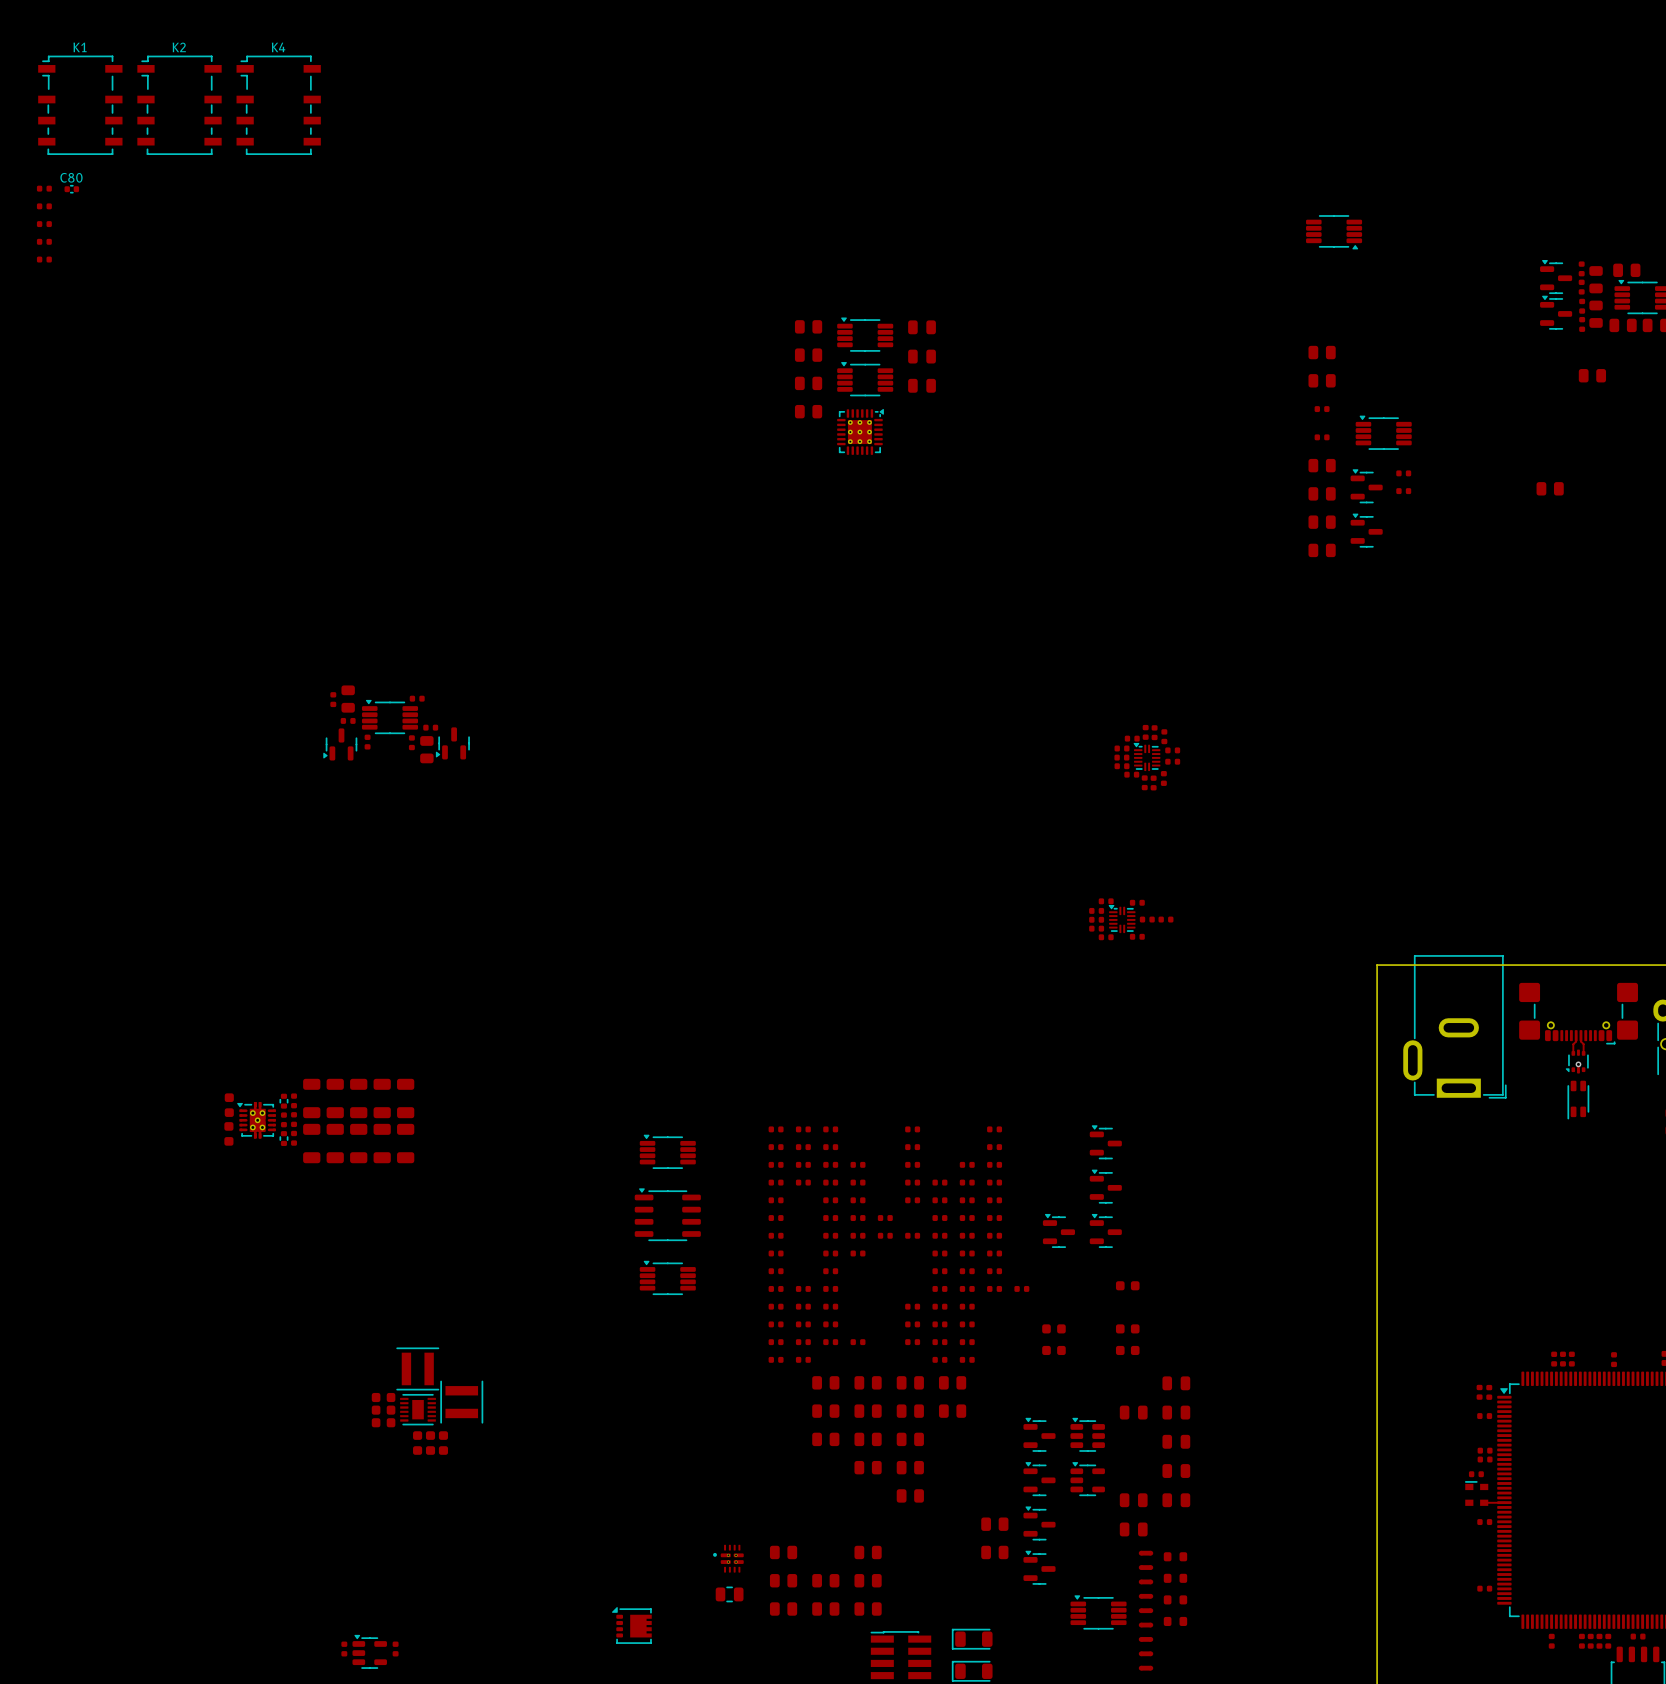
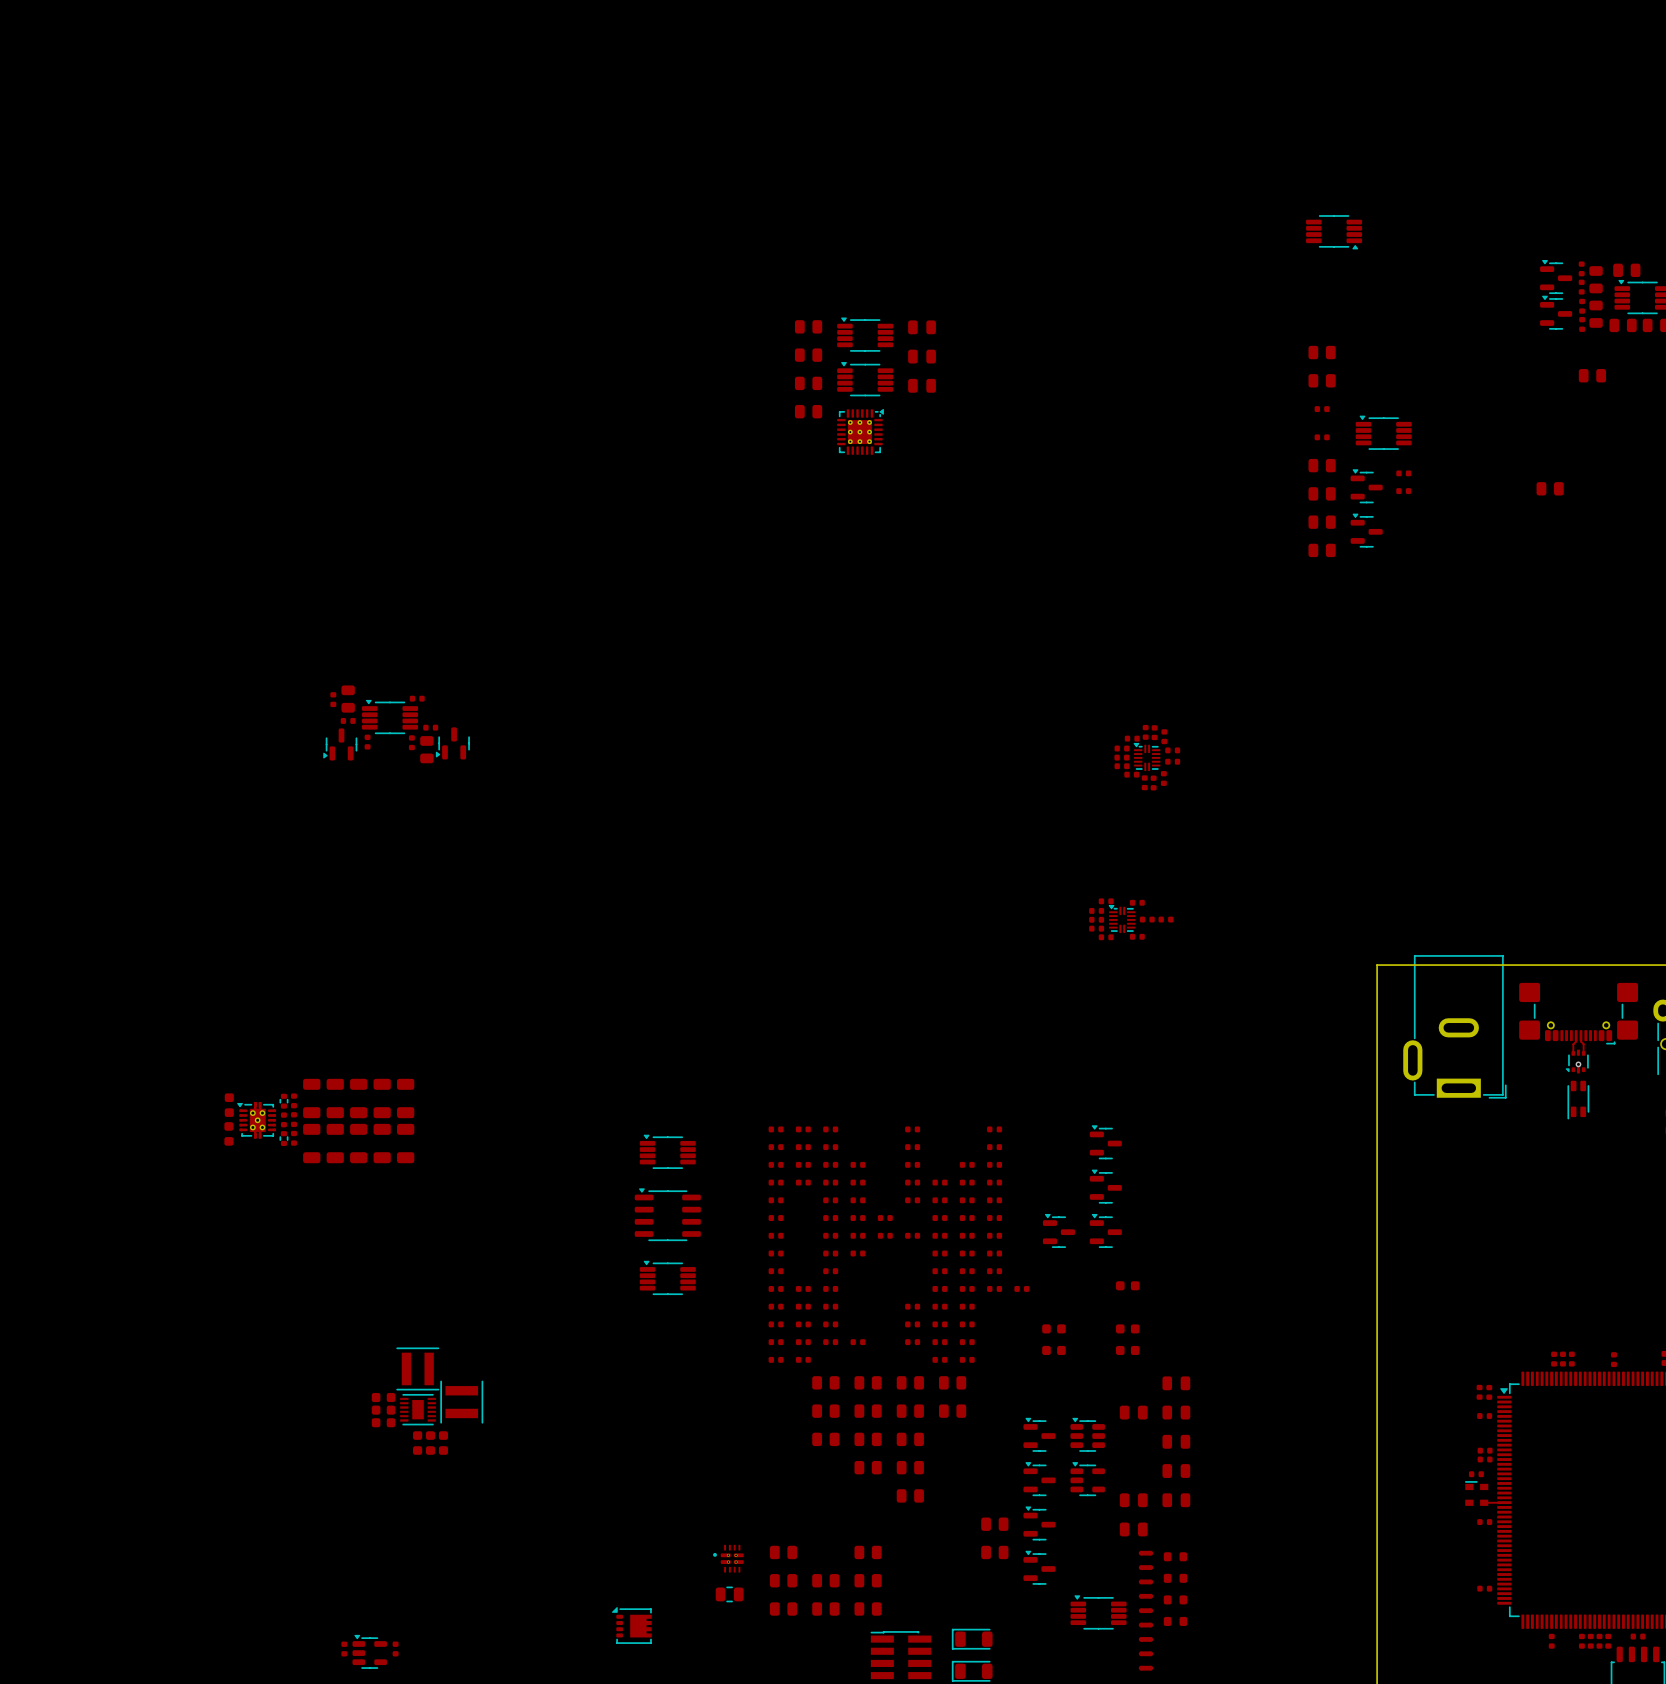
K1: (80, 105) -> none
K2: (179, 105) -> none
K4: (278, 105) -> none
part: (44, 188) -> none
C80: (71, 189) -> none
part: (44, 206) -> none
part: (44, 224) -> none
part: (44, 241) -> none
part: (44, 259) -> none

